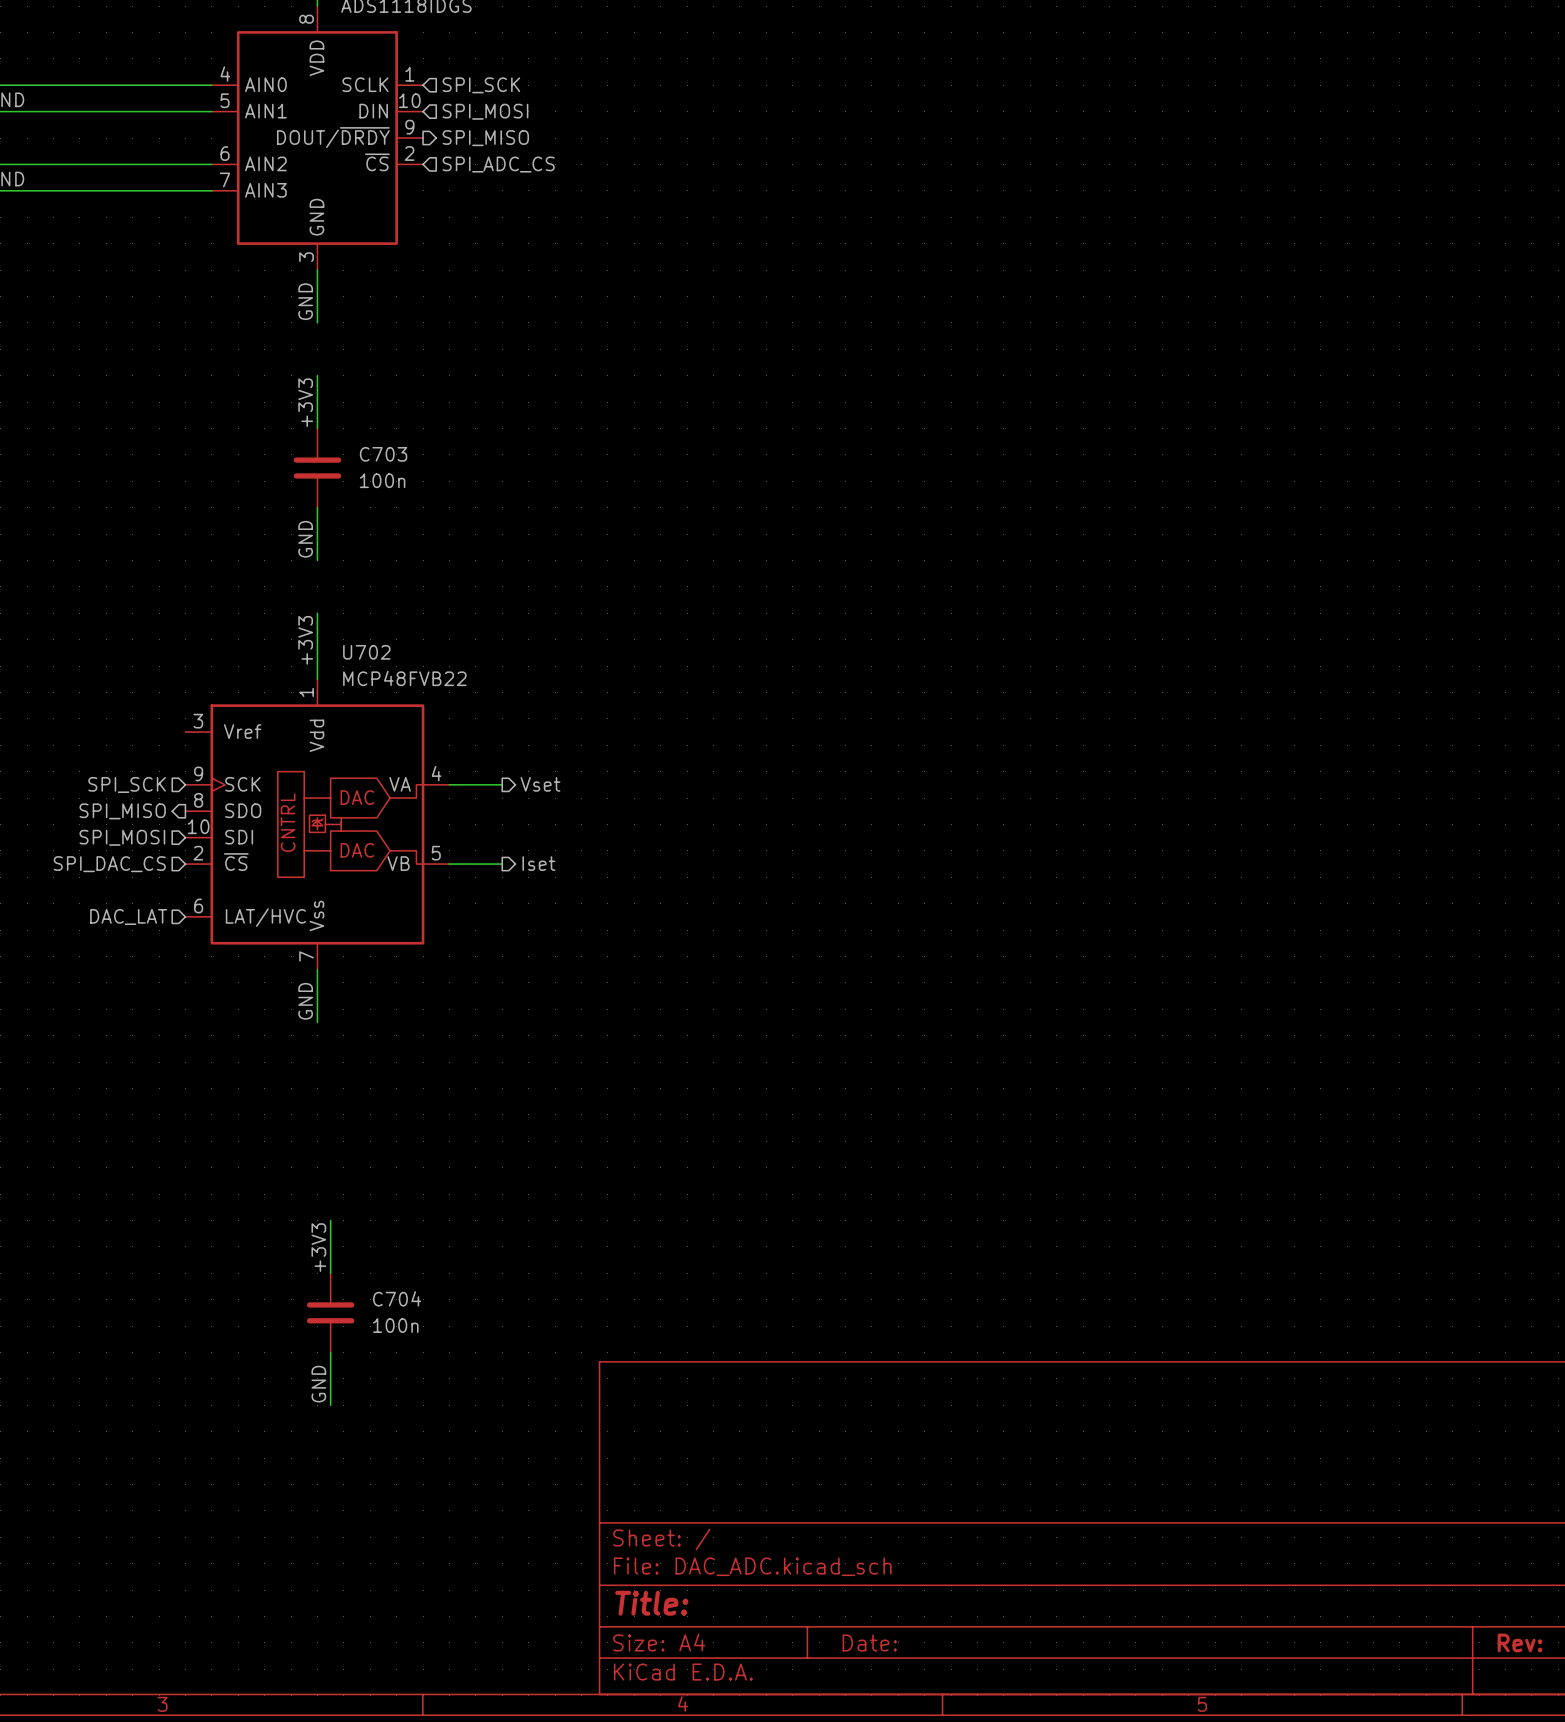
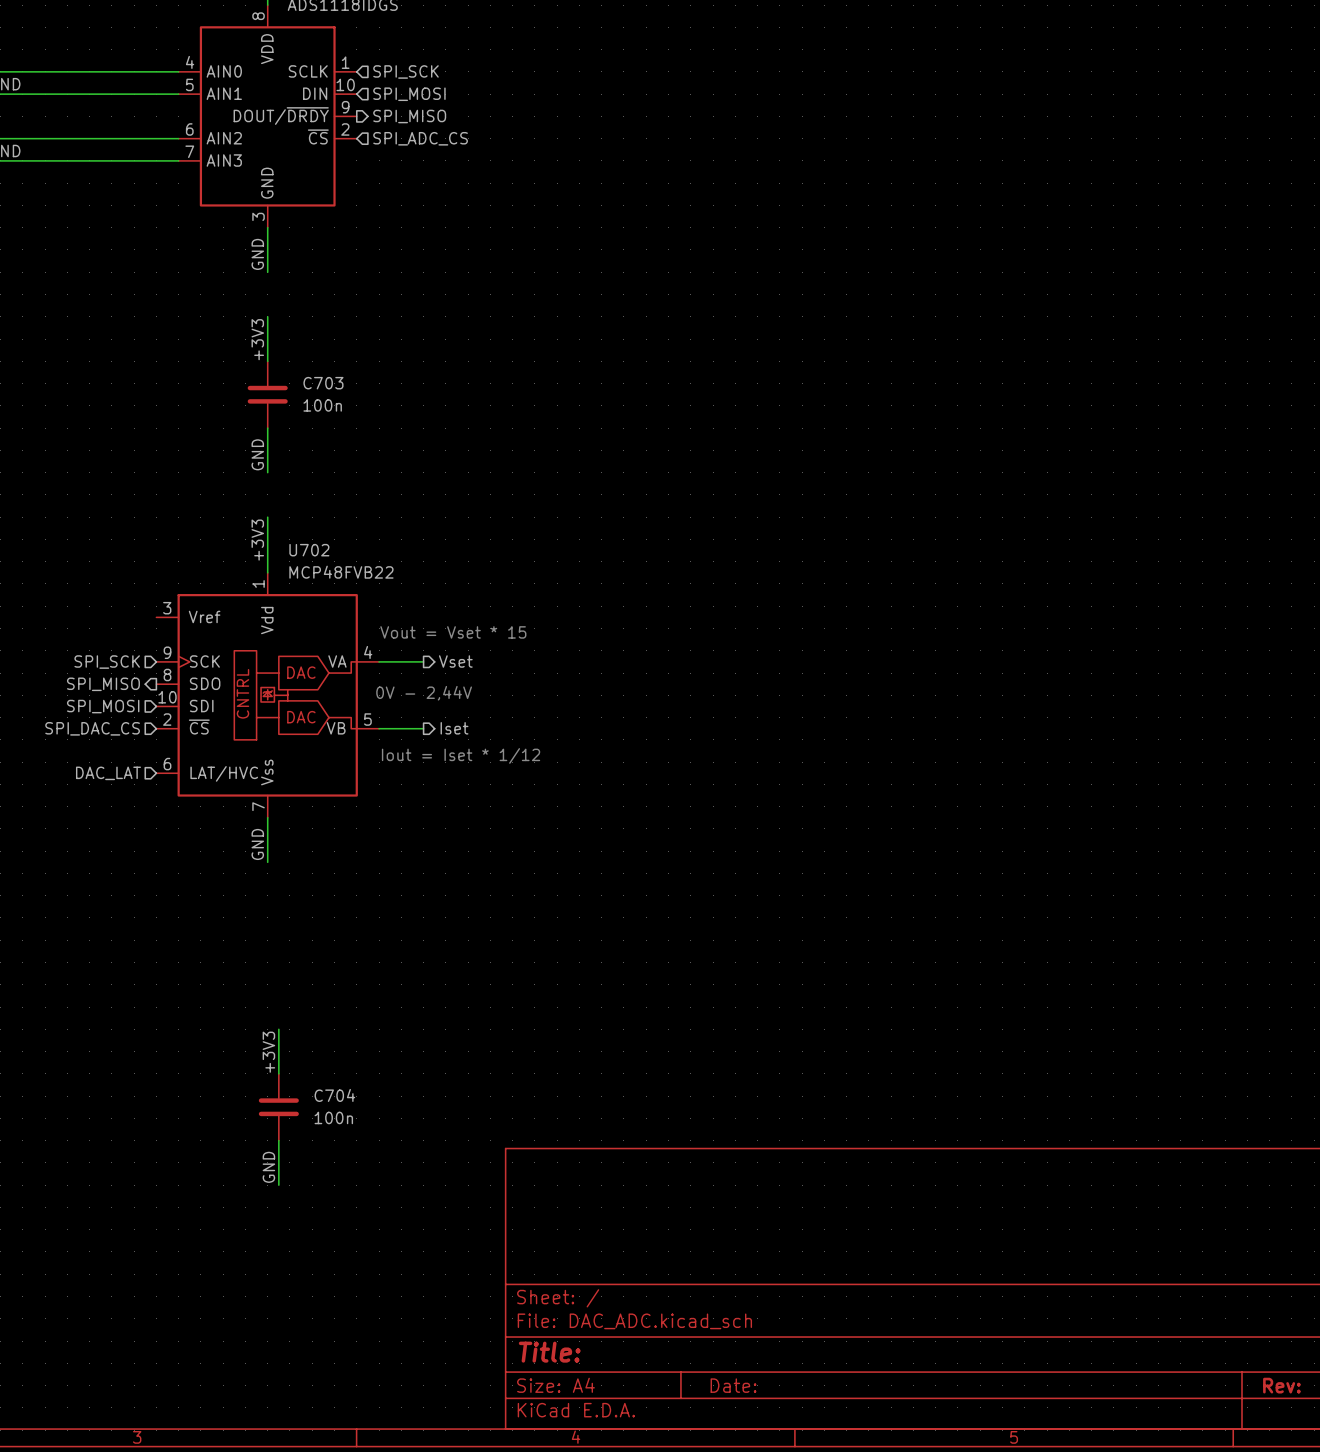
text: none -> Vout = Vset * 15 (453, 632)
text: none -> 0V - 2,44V (424, 693)
text: none -> Iout = Iset * 1/12 (461, 755)

